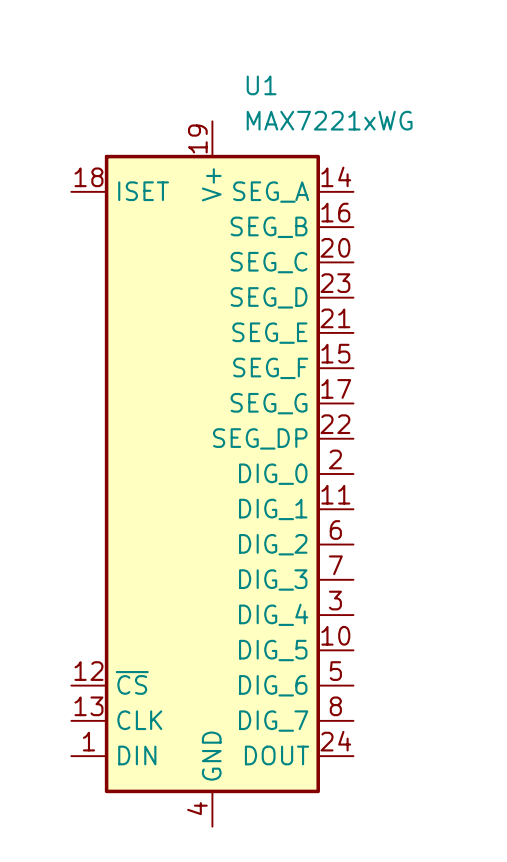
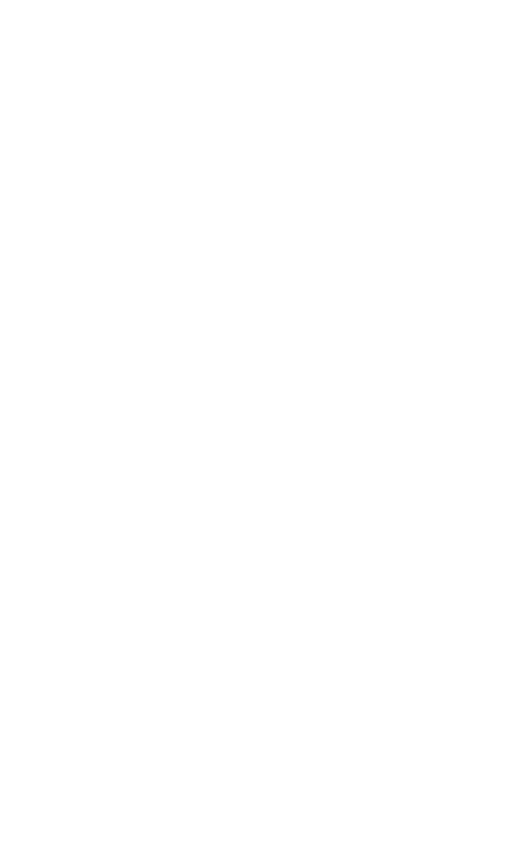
U1: MAX7221xWG (212, 474) -> none

